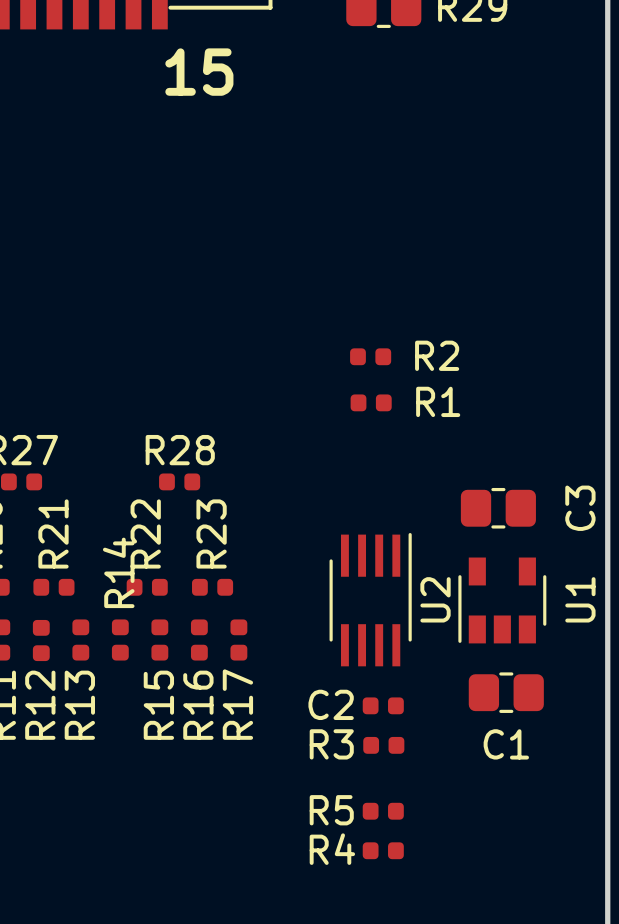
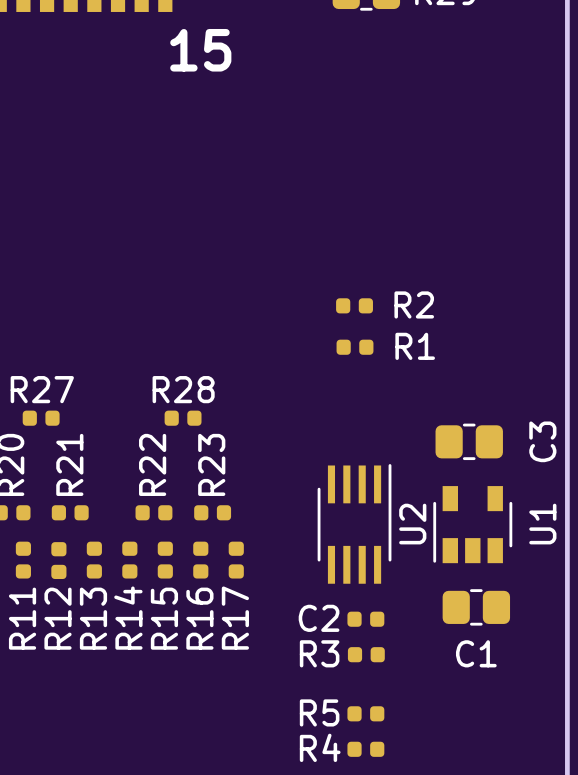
R14 name position: R14 (118, 572) -> R14 (128, 618)

